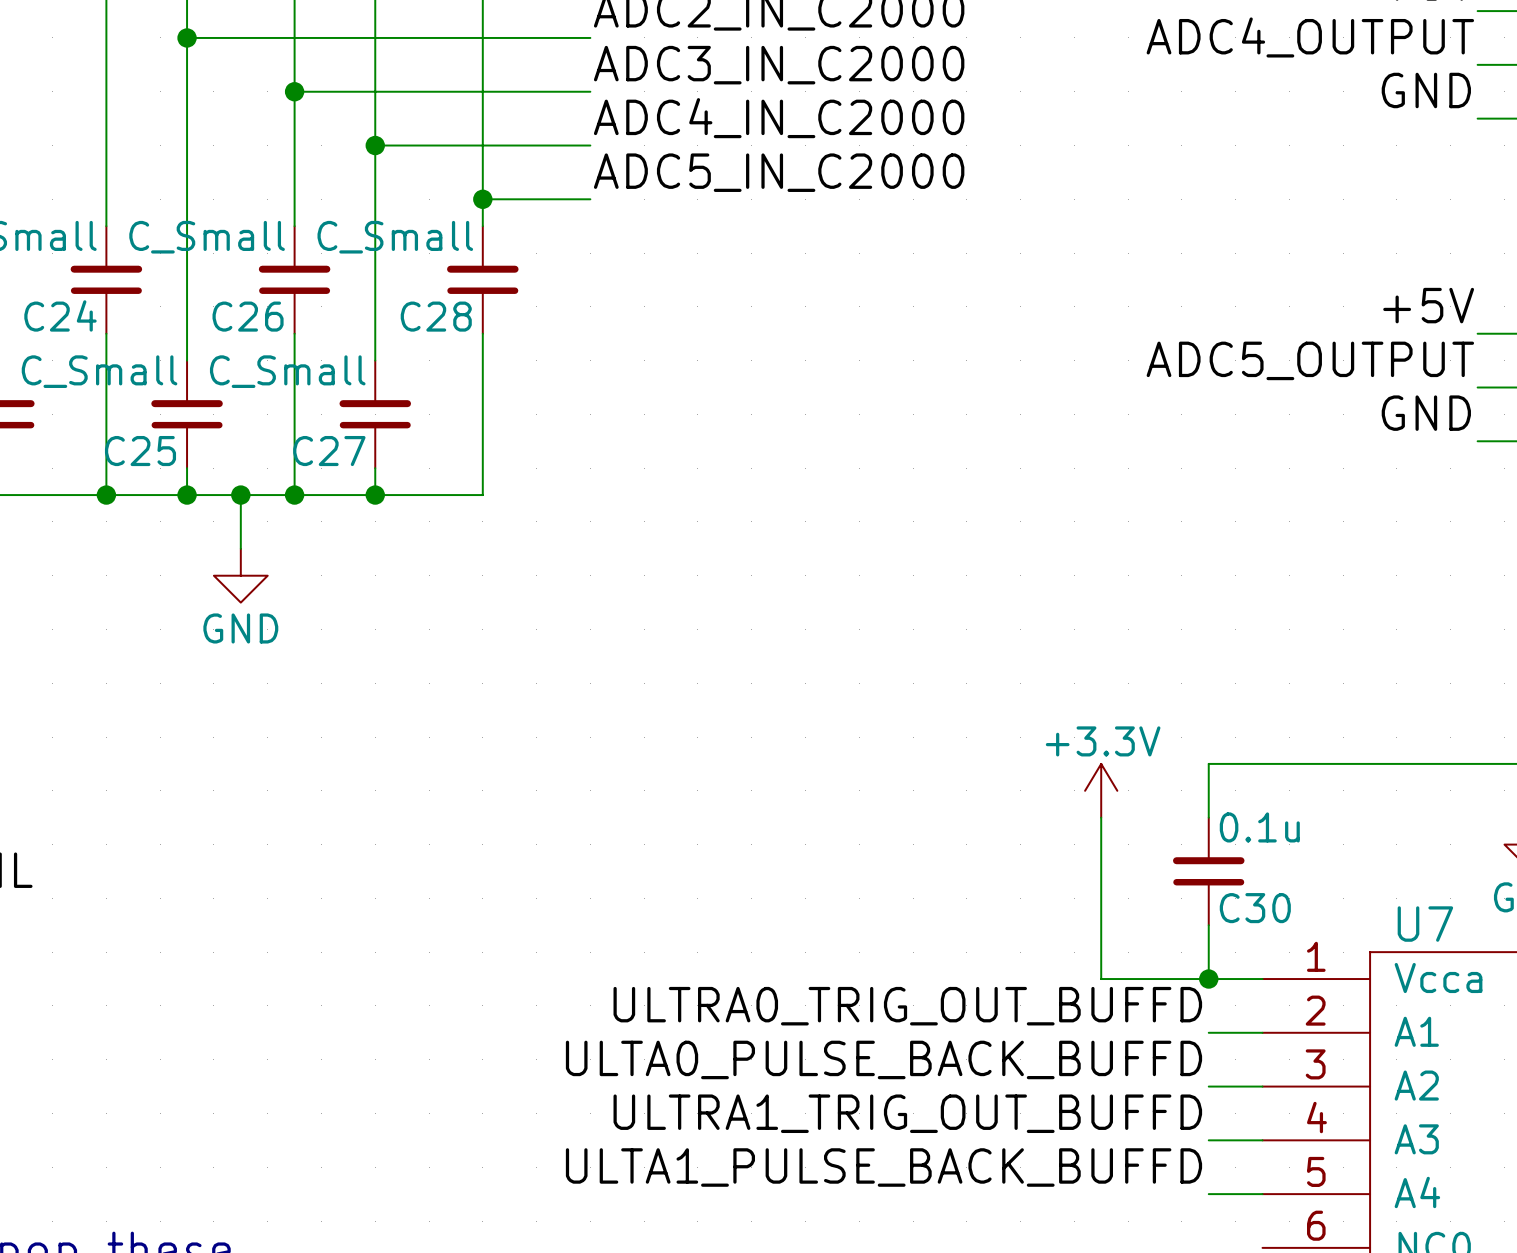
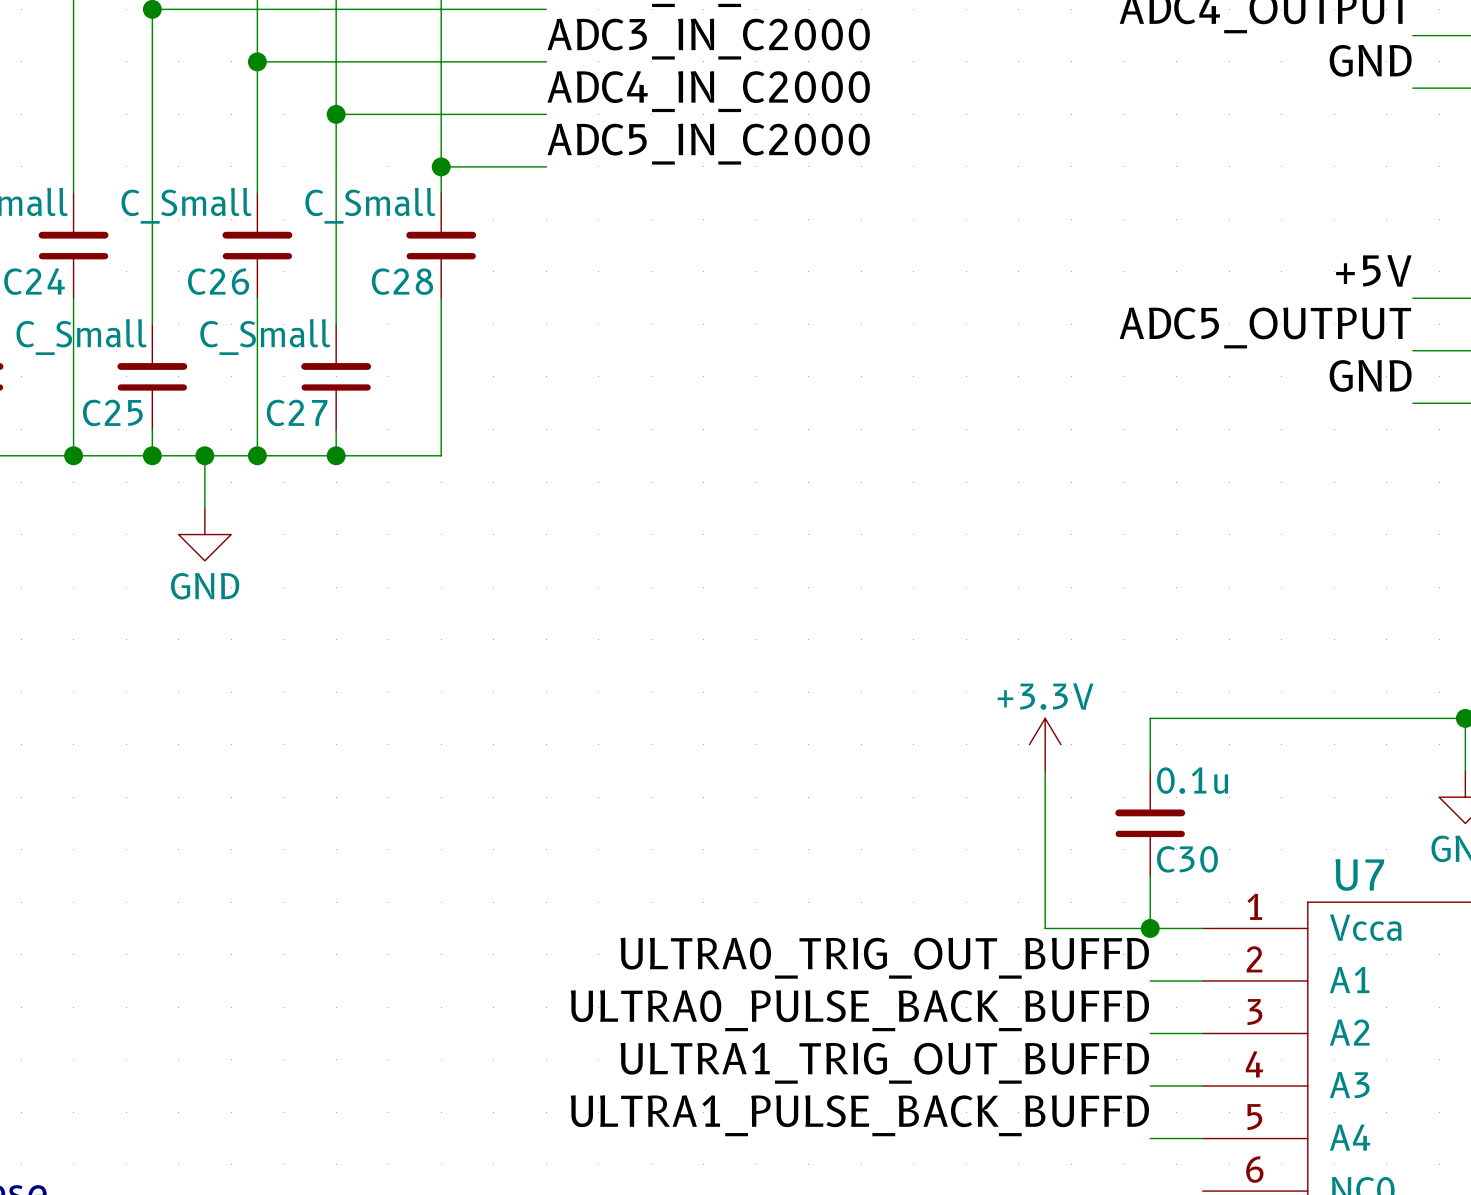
label: ULTA0_PULSE_BACK_BUFFD (883, 1059) -> ULTRA0_PULSE_BACK_BUFFD (859, 1010)
label: ULTA1_PULSE_BACK_BUFFD (883, 1167) -> ULTRA1_PULSE_BACK_BUFFD (859, 1115)

